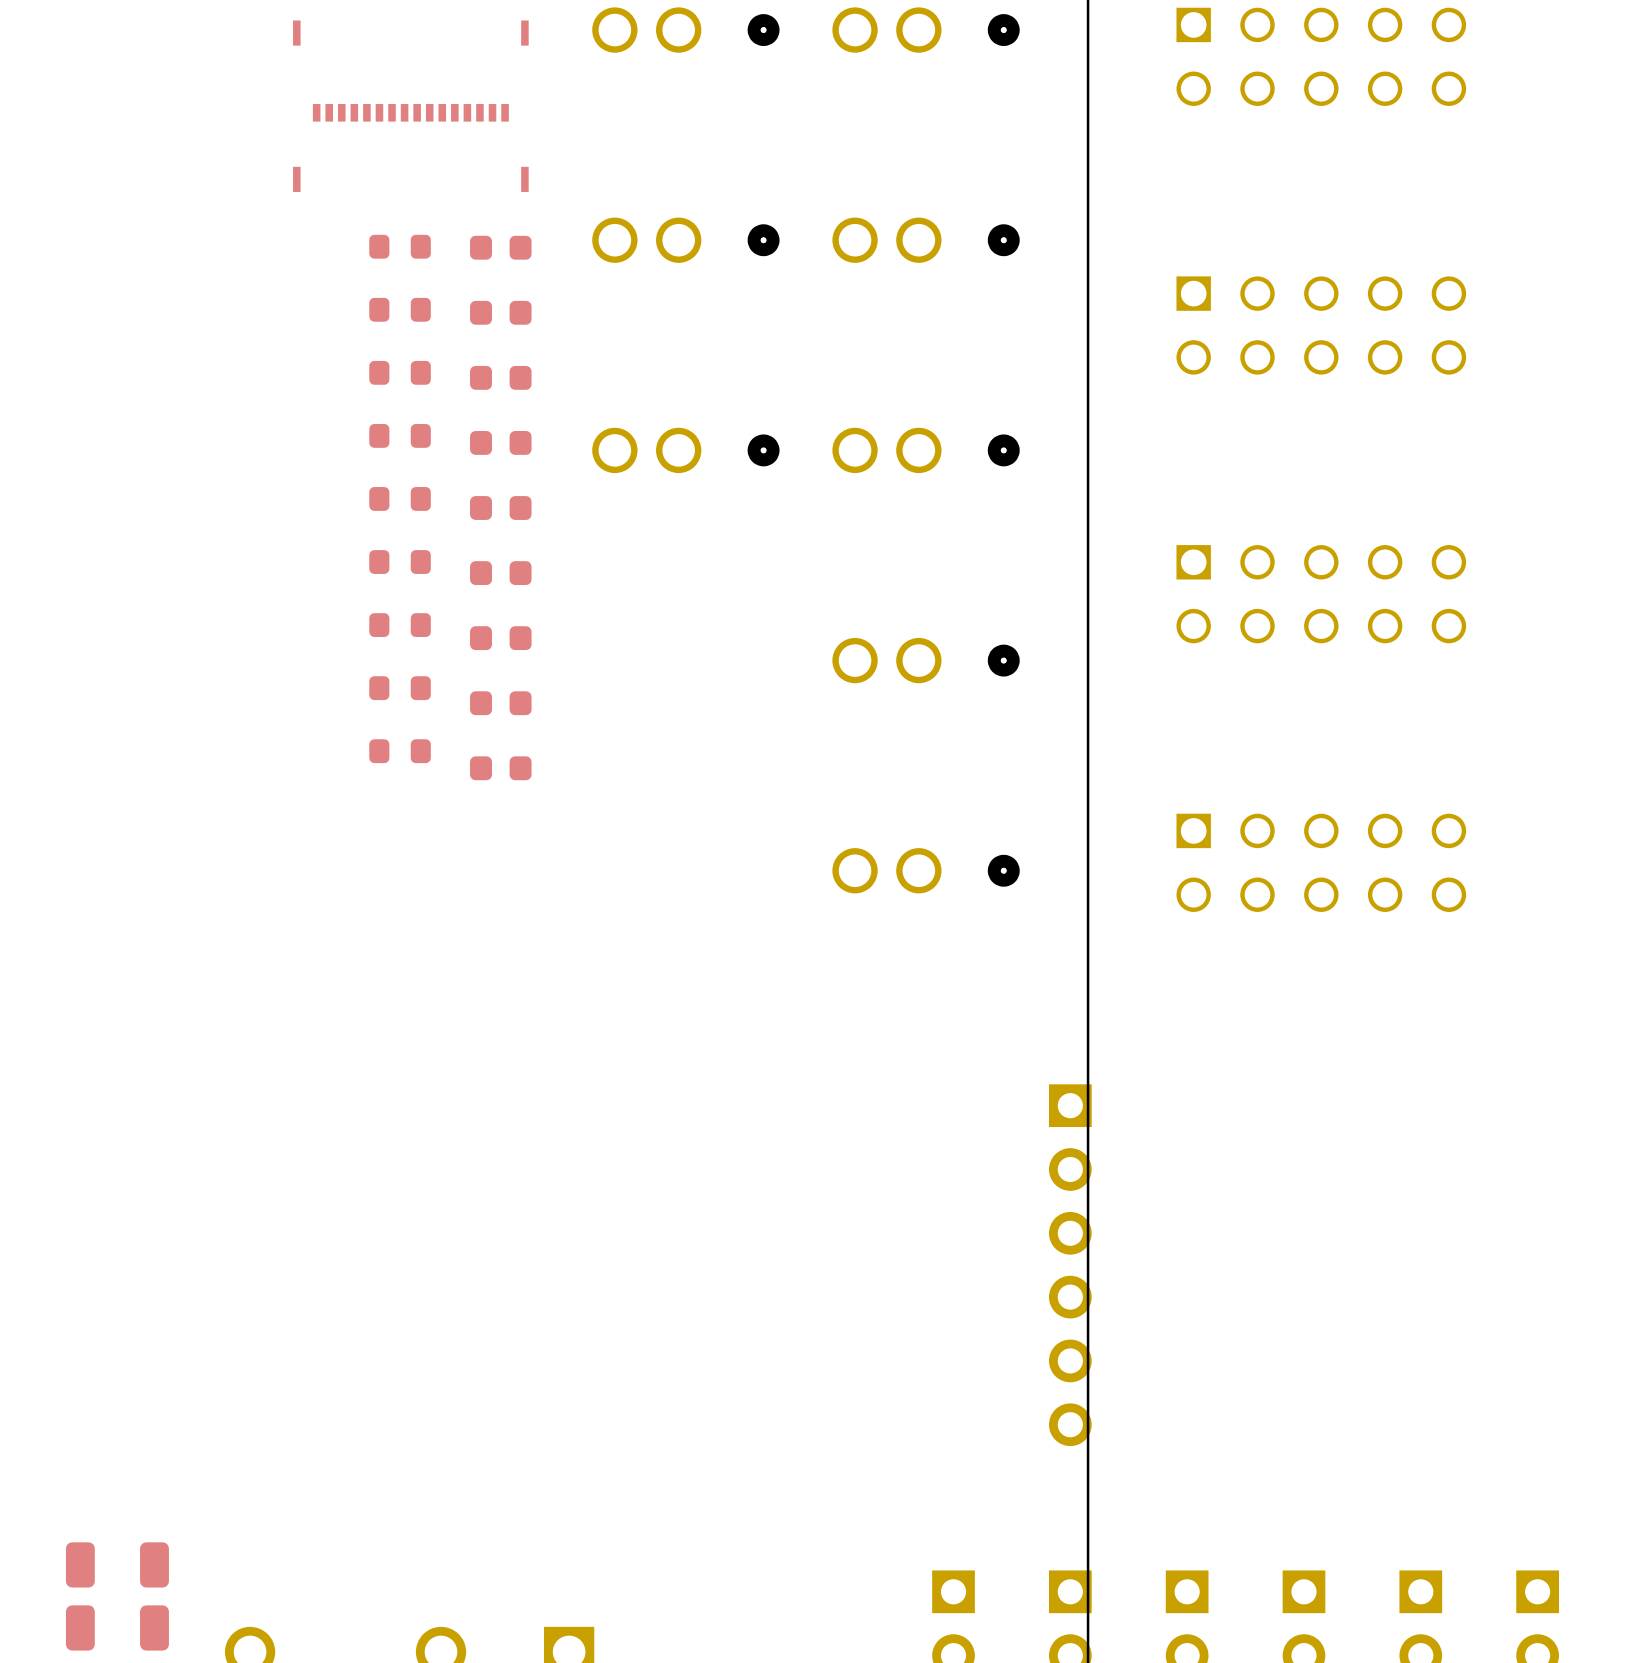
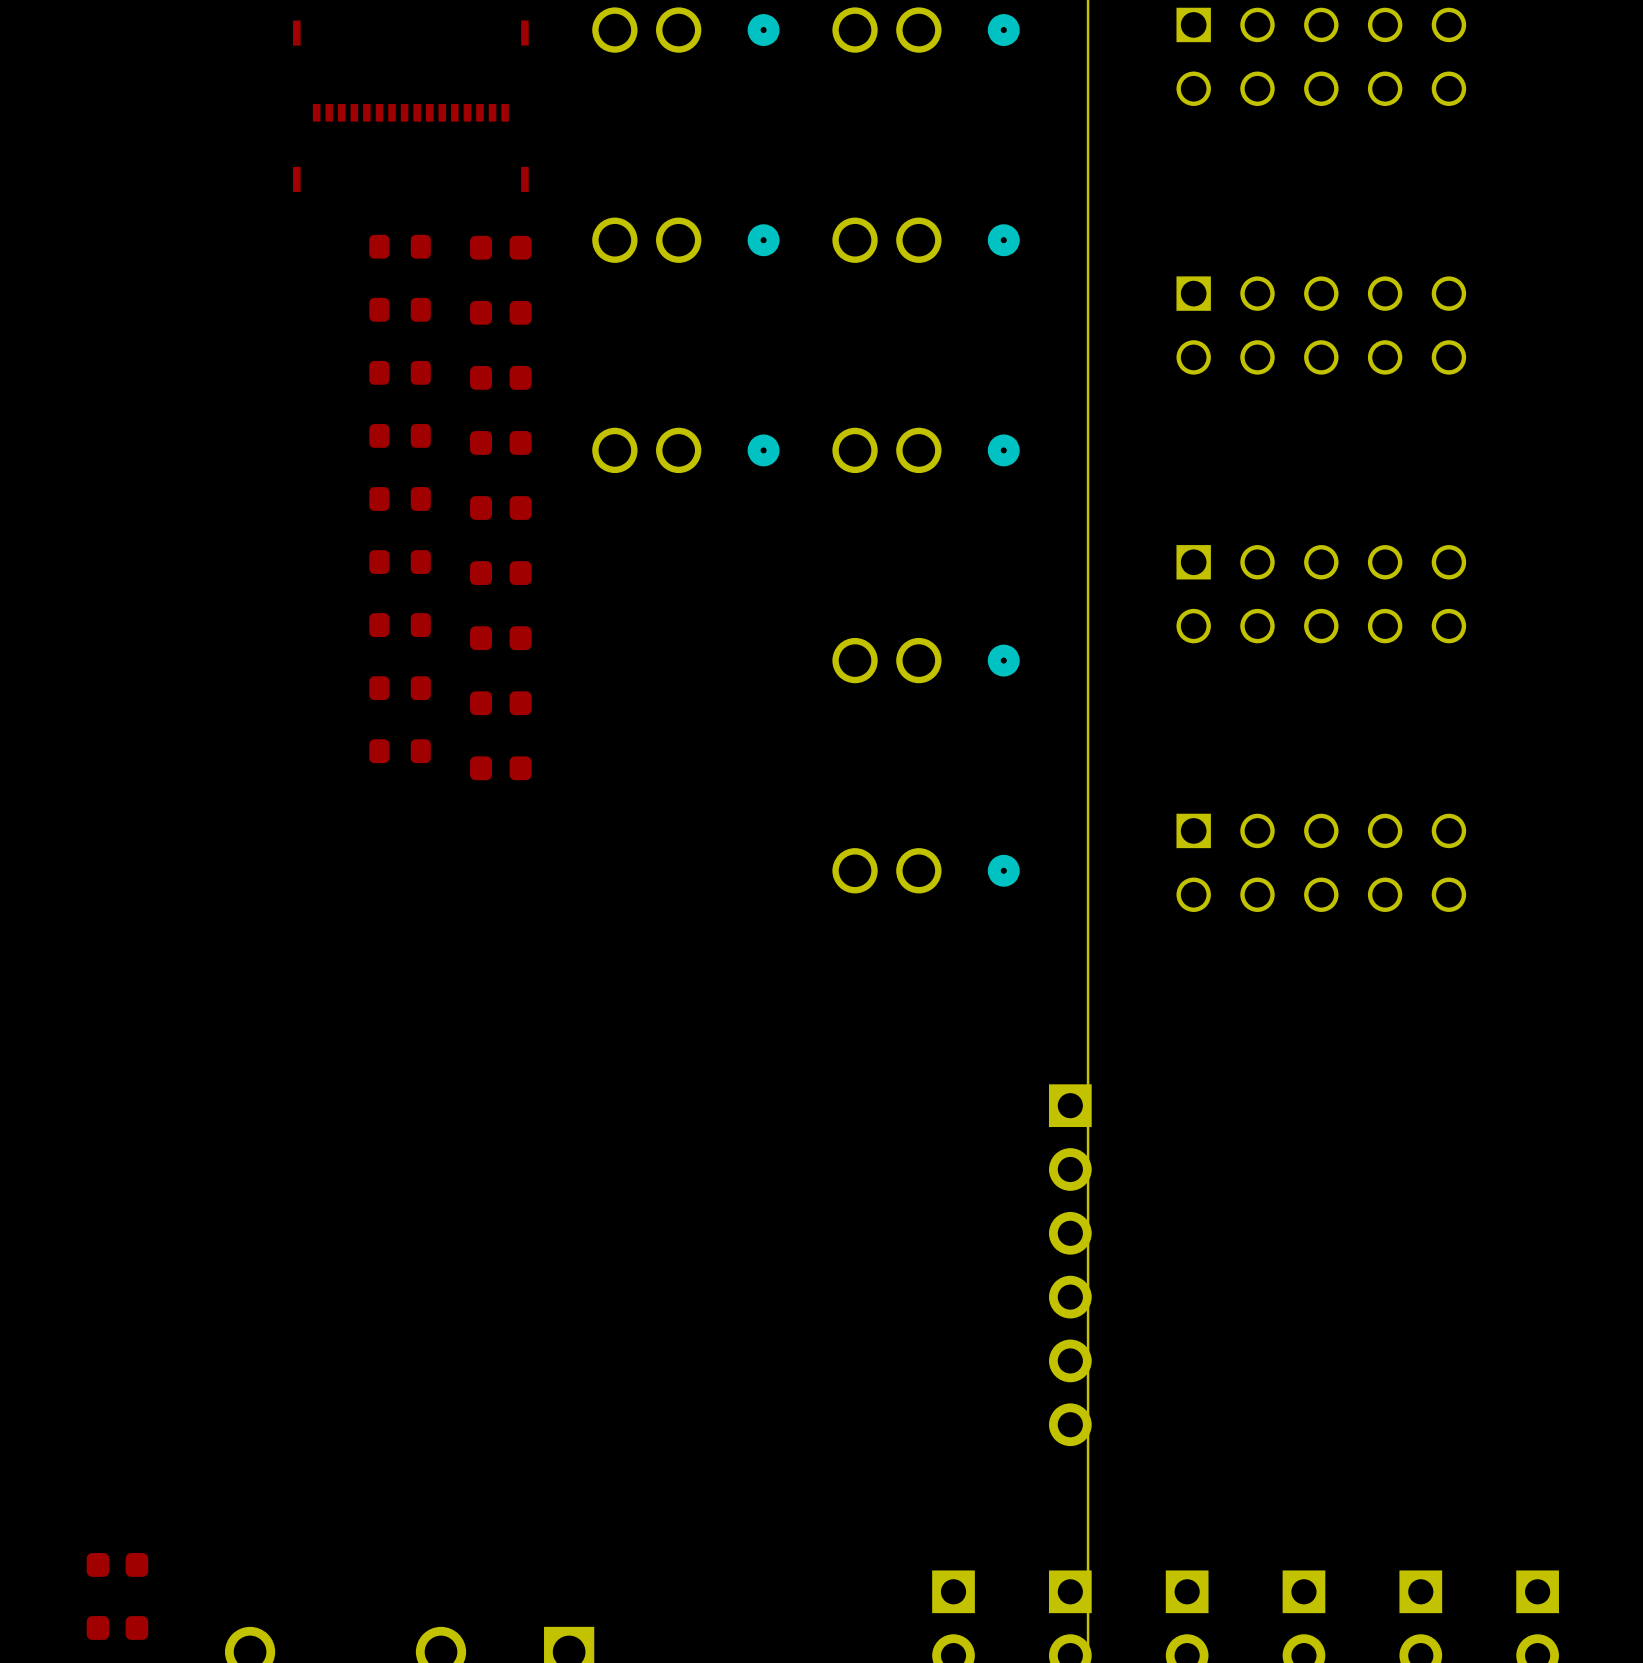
part footprint: [65, 1542, 169, 1588] -> [86, 1552, 149, 1577]
part footprint: [65, 1605, 169, 1651] -> [86, 1616, 149, 1640]

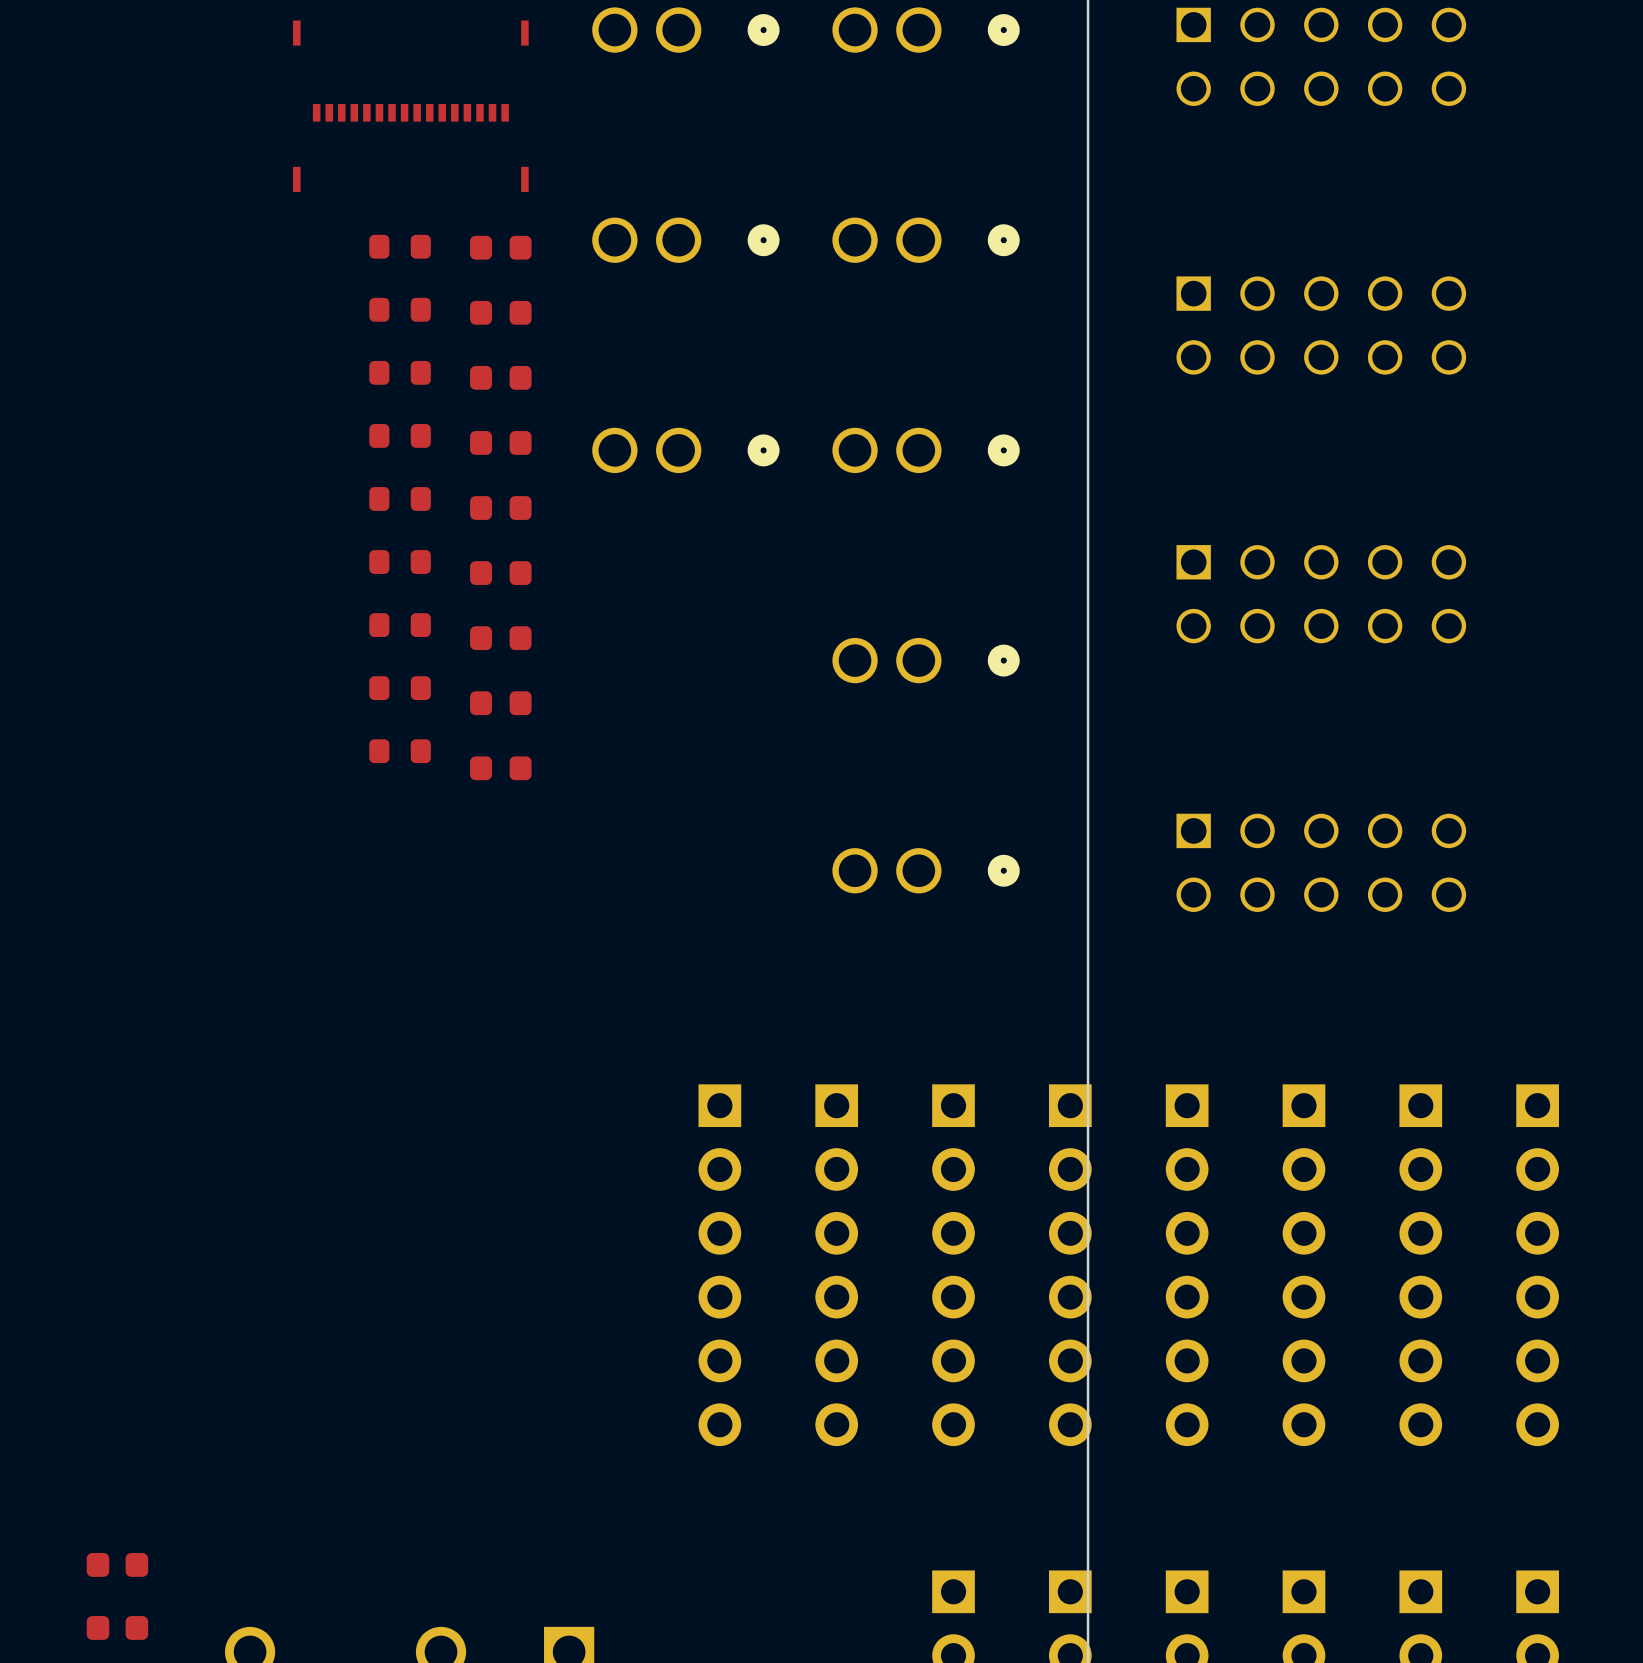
part: none -> (719, 1265)
part: none -> (836, 1265)
part: none -> (953, 1265)
part: none -> (1187, 1265)
part: none -> (1303, 1265)
part: none -> (1420, 1265)
part: none -> (1537, 1265)

